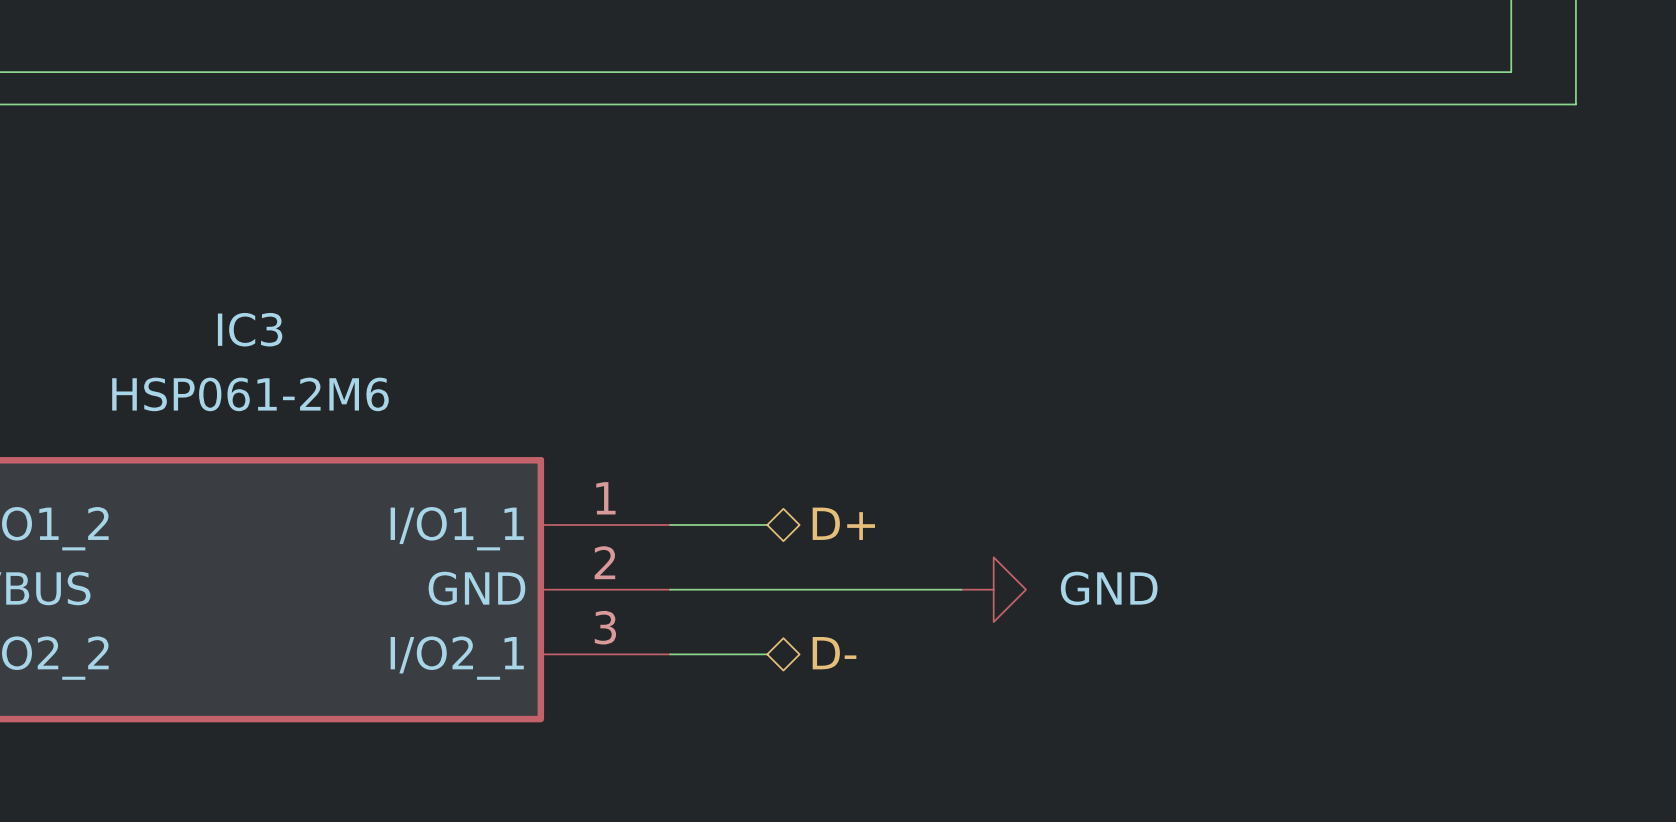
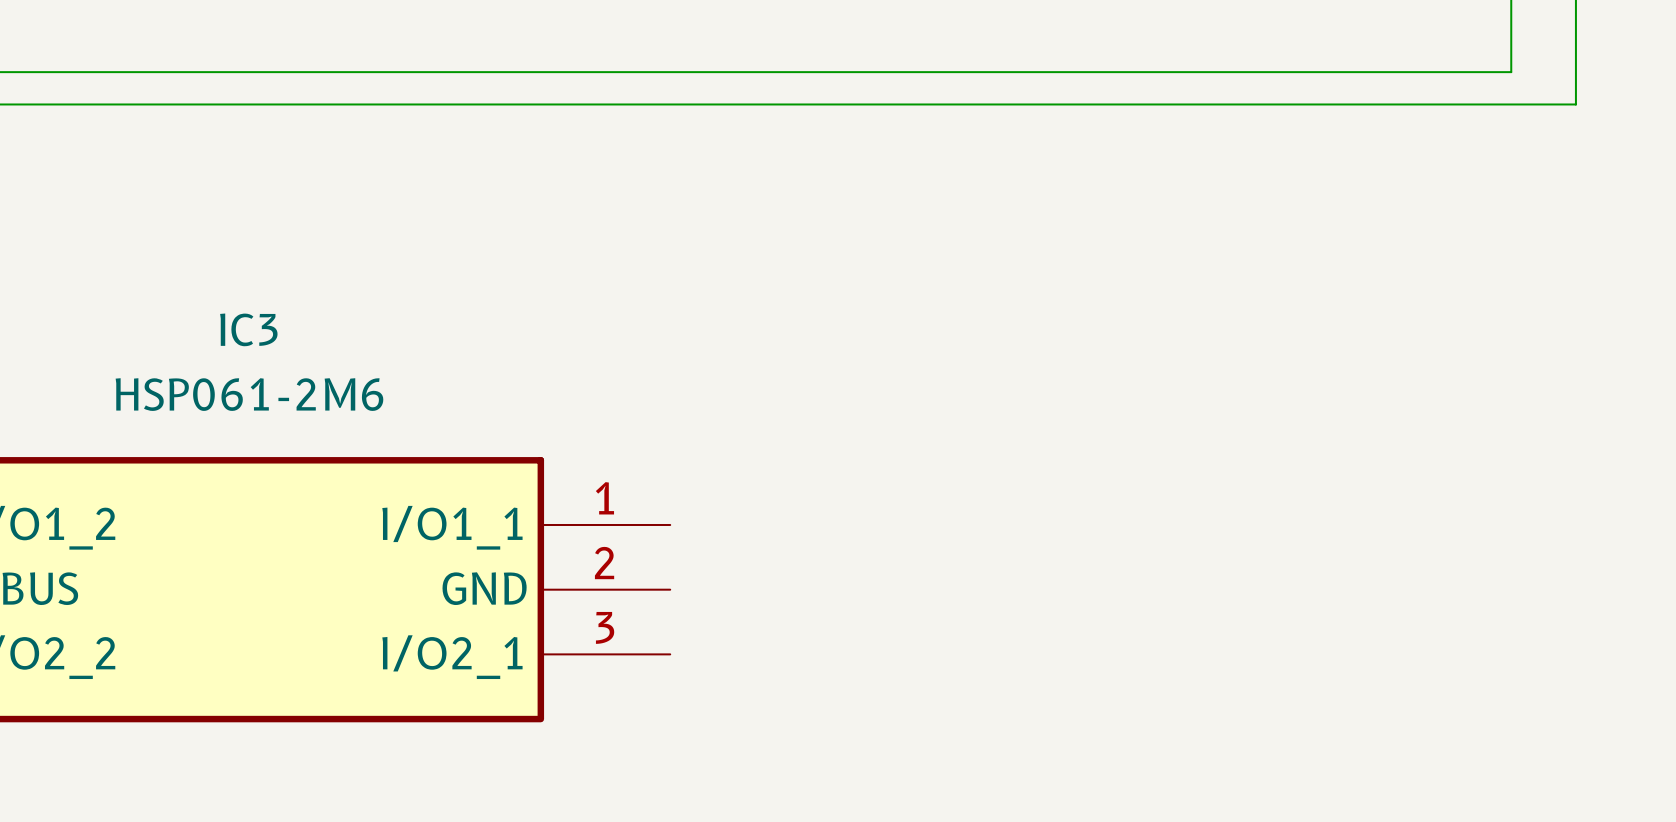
hierarchical label: D+ (843, 523) -> none
wire: (670, 524) (767, 524) -> none
wire: (670, 589) (961, 589) -> none
power symbol: GND (993, 589) -> none
hierarchical label: D- (834, 653) -> none
wire: (670, 654) (767, 654) -> none

